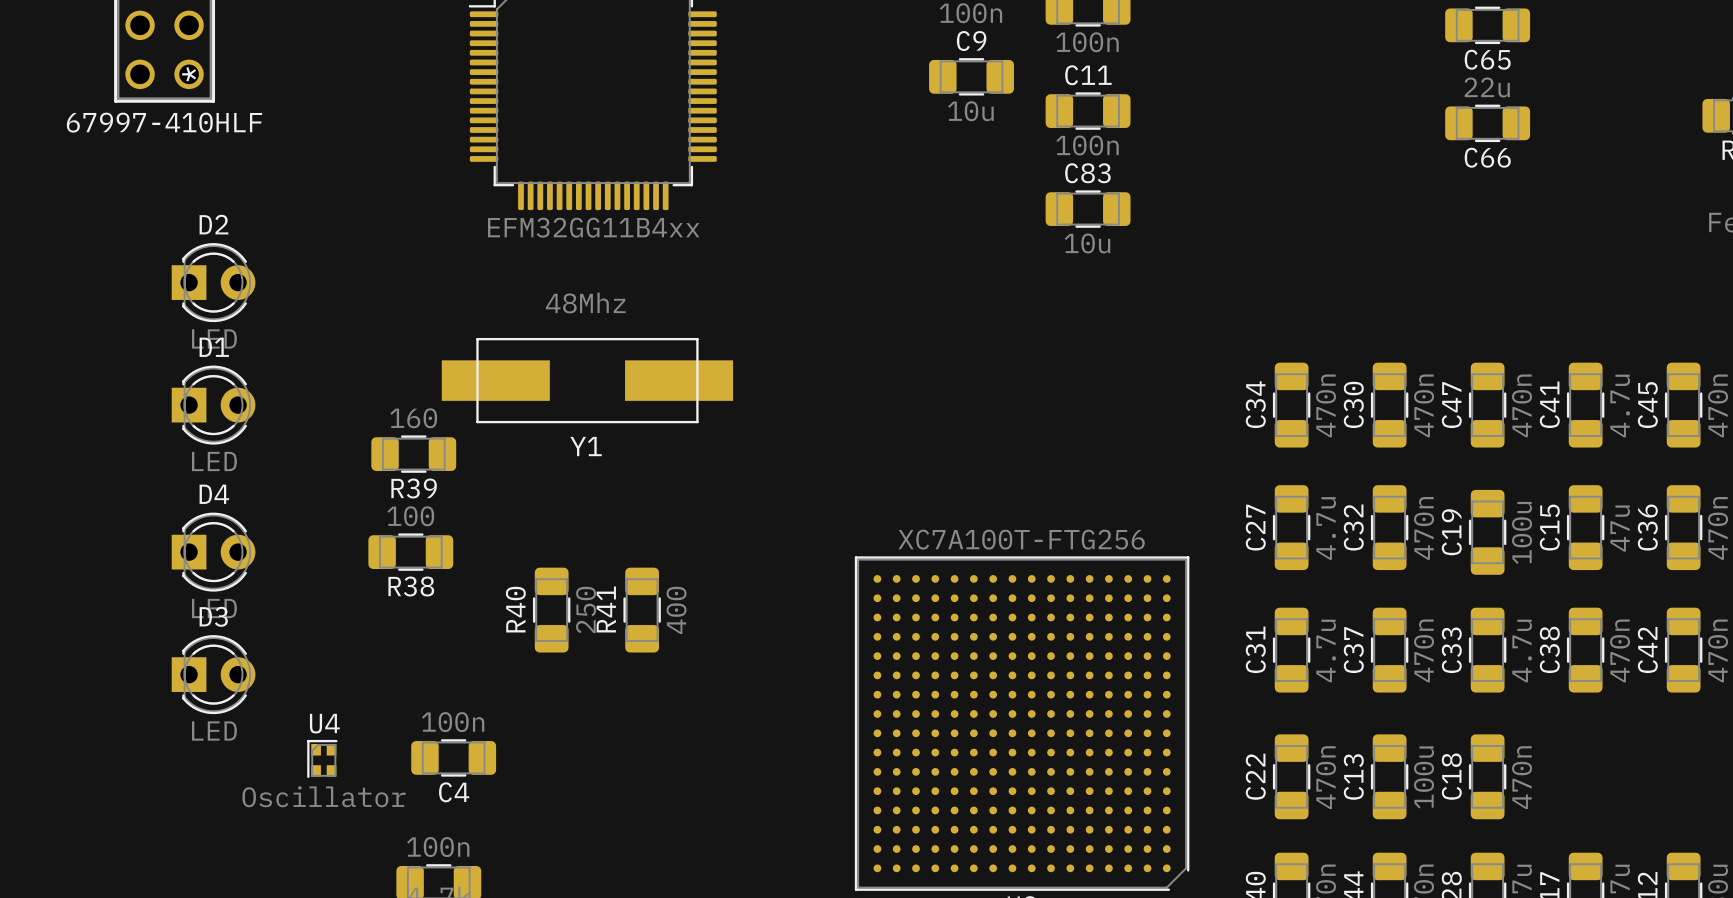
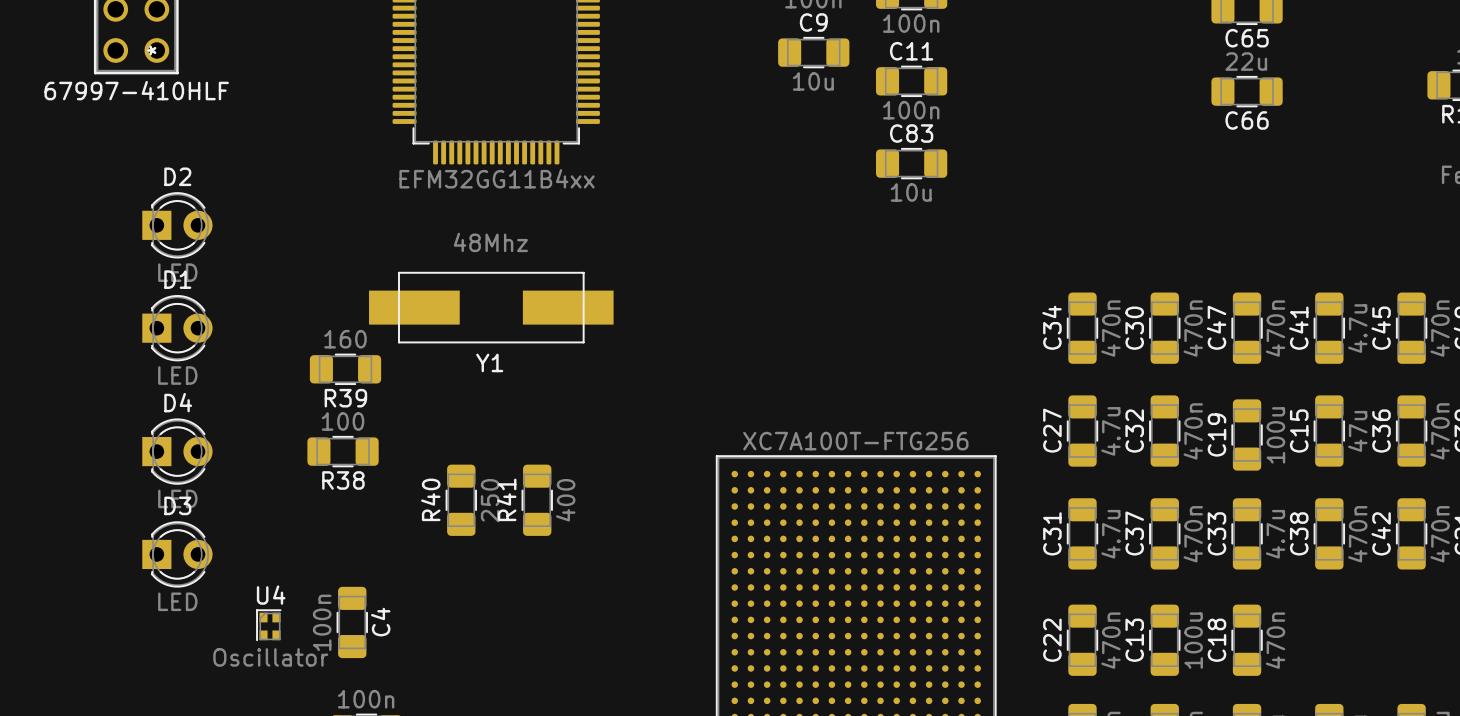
C4 value position: 100n (453, 722) -> 100n (322, 622)
C4 rotation: 0° (453, 757) -> 90° clockwise (352, 622)
C4 name position: C4 (454, 792) -> C4 (380, 622)

